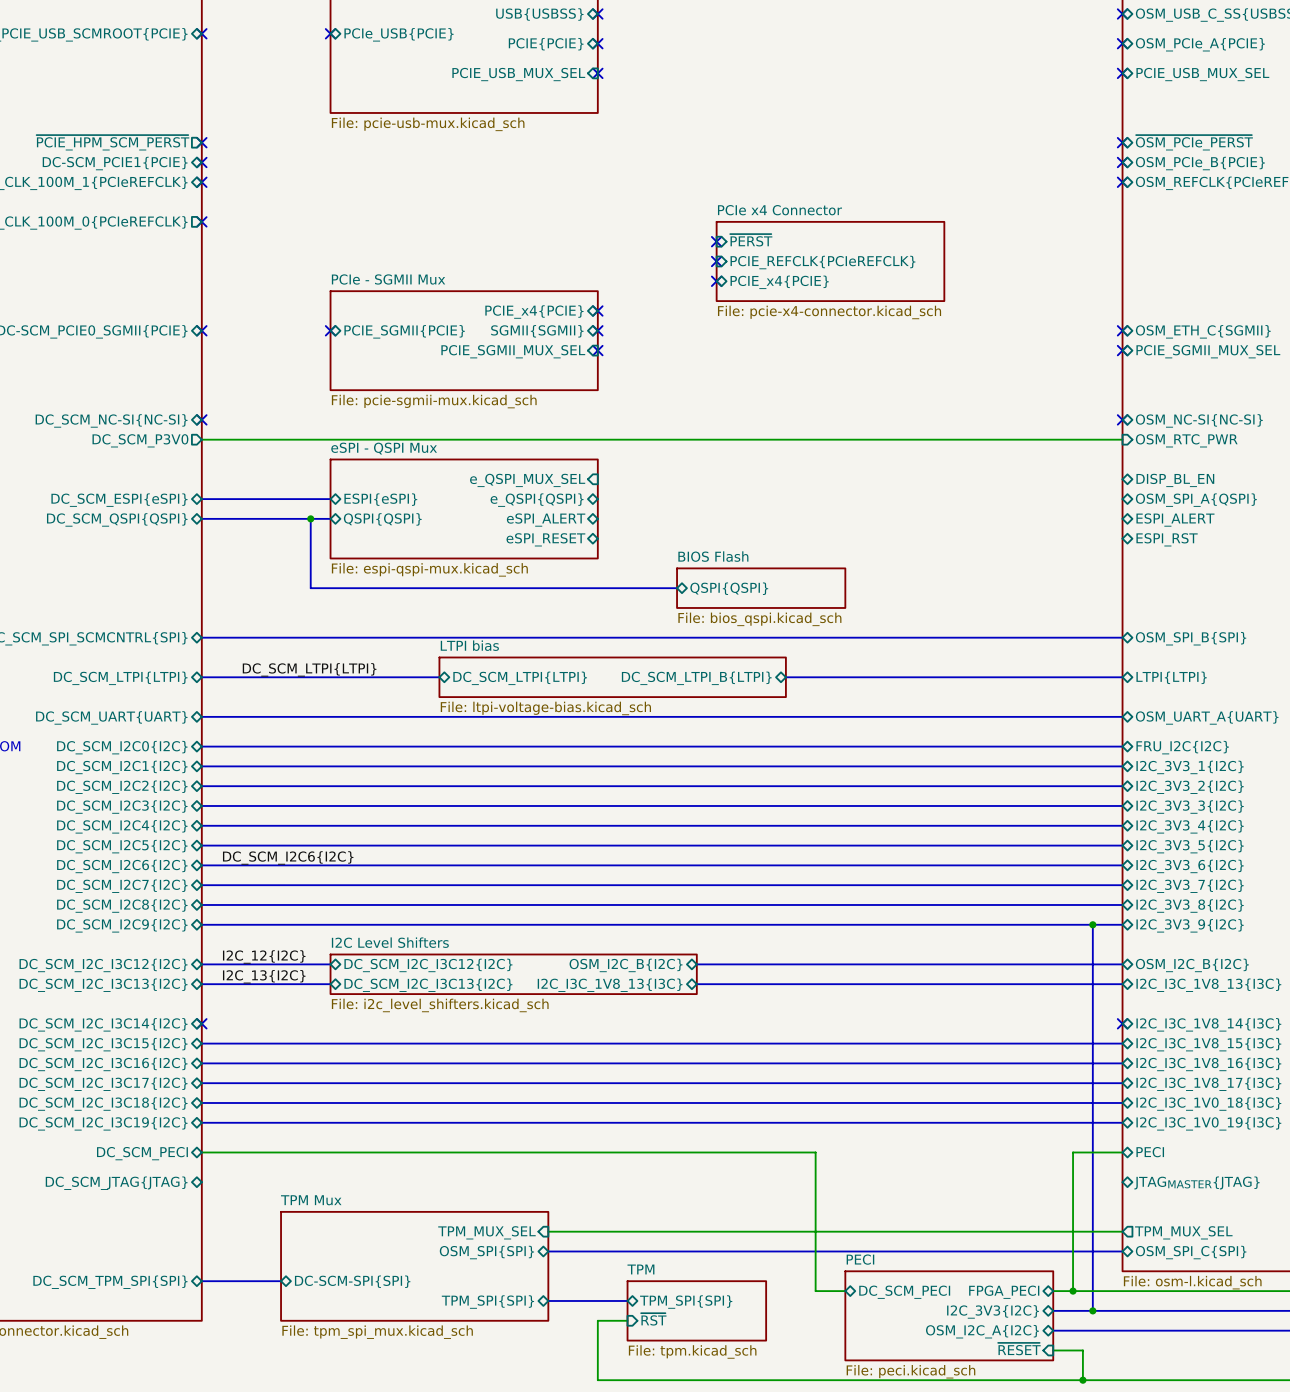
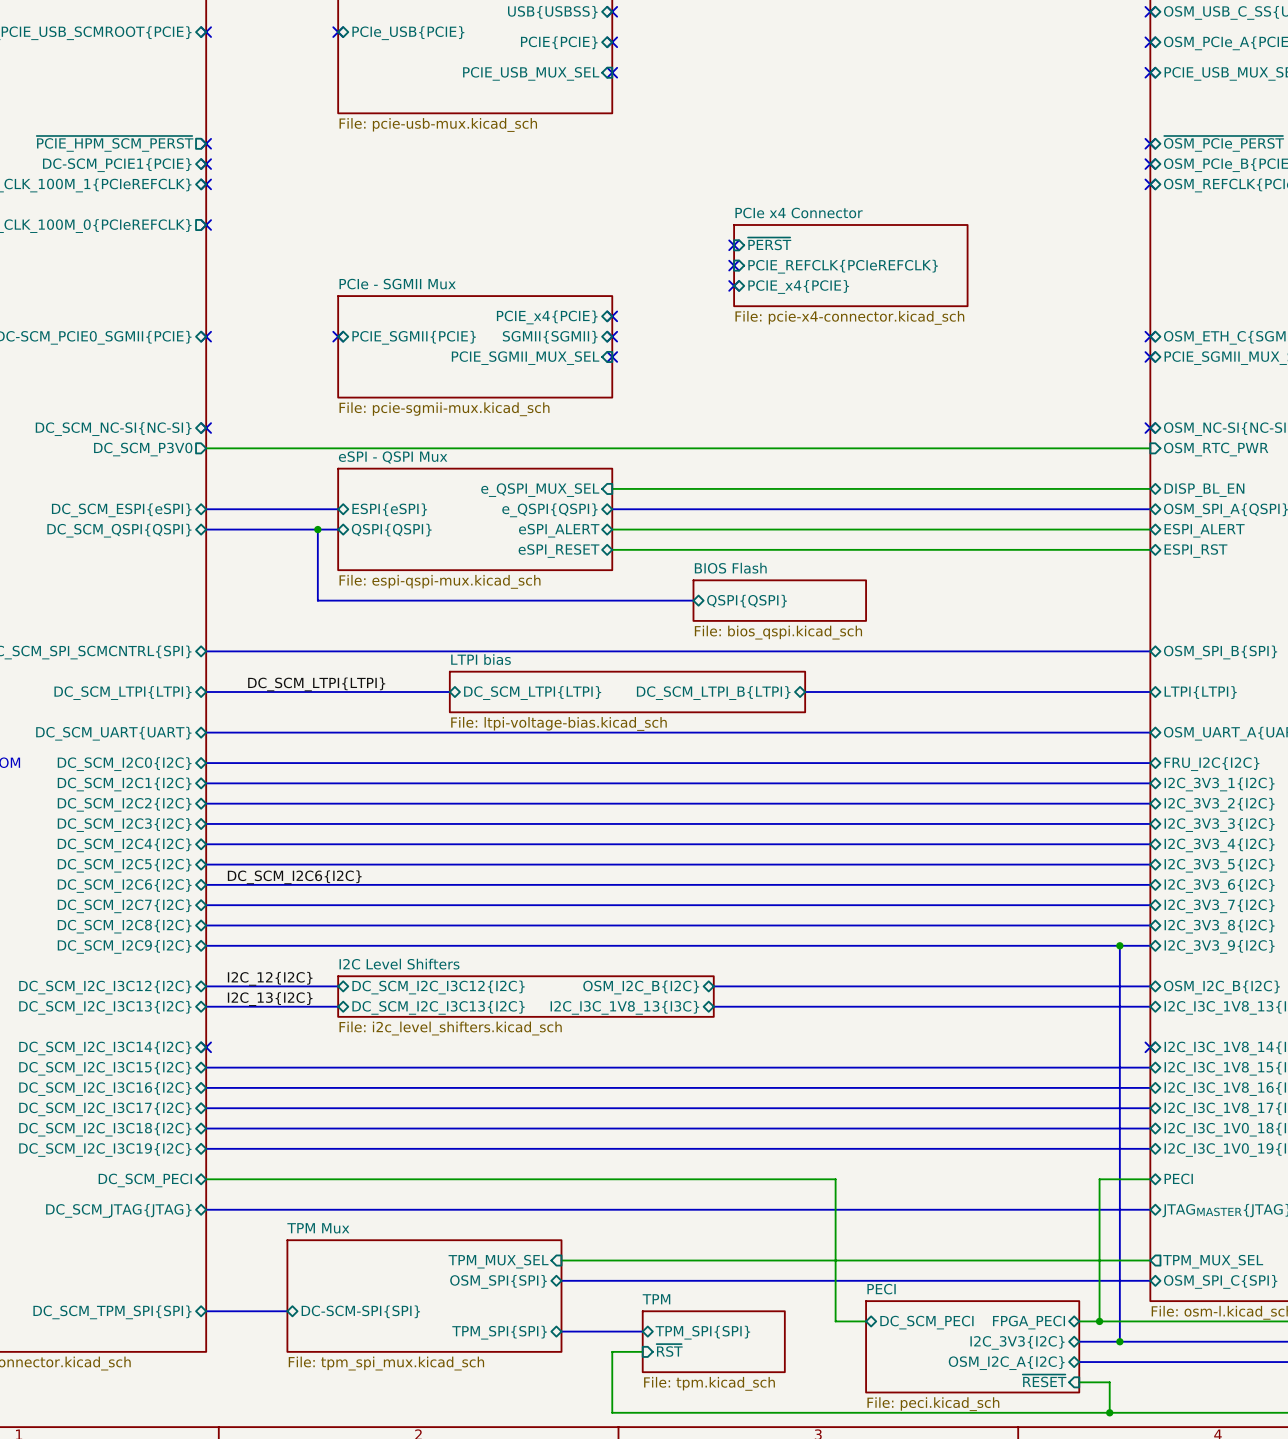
wire: none -> (612, 488) (1150, 488)
bus: none -> (612, 509) (1150, 509)
wire: none -> (612, 529) (1150, 529)
wire: none -> (612, 549) (1150, 549)
bus: none -> (206, 1209) (1150, 1209)

